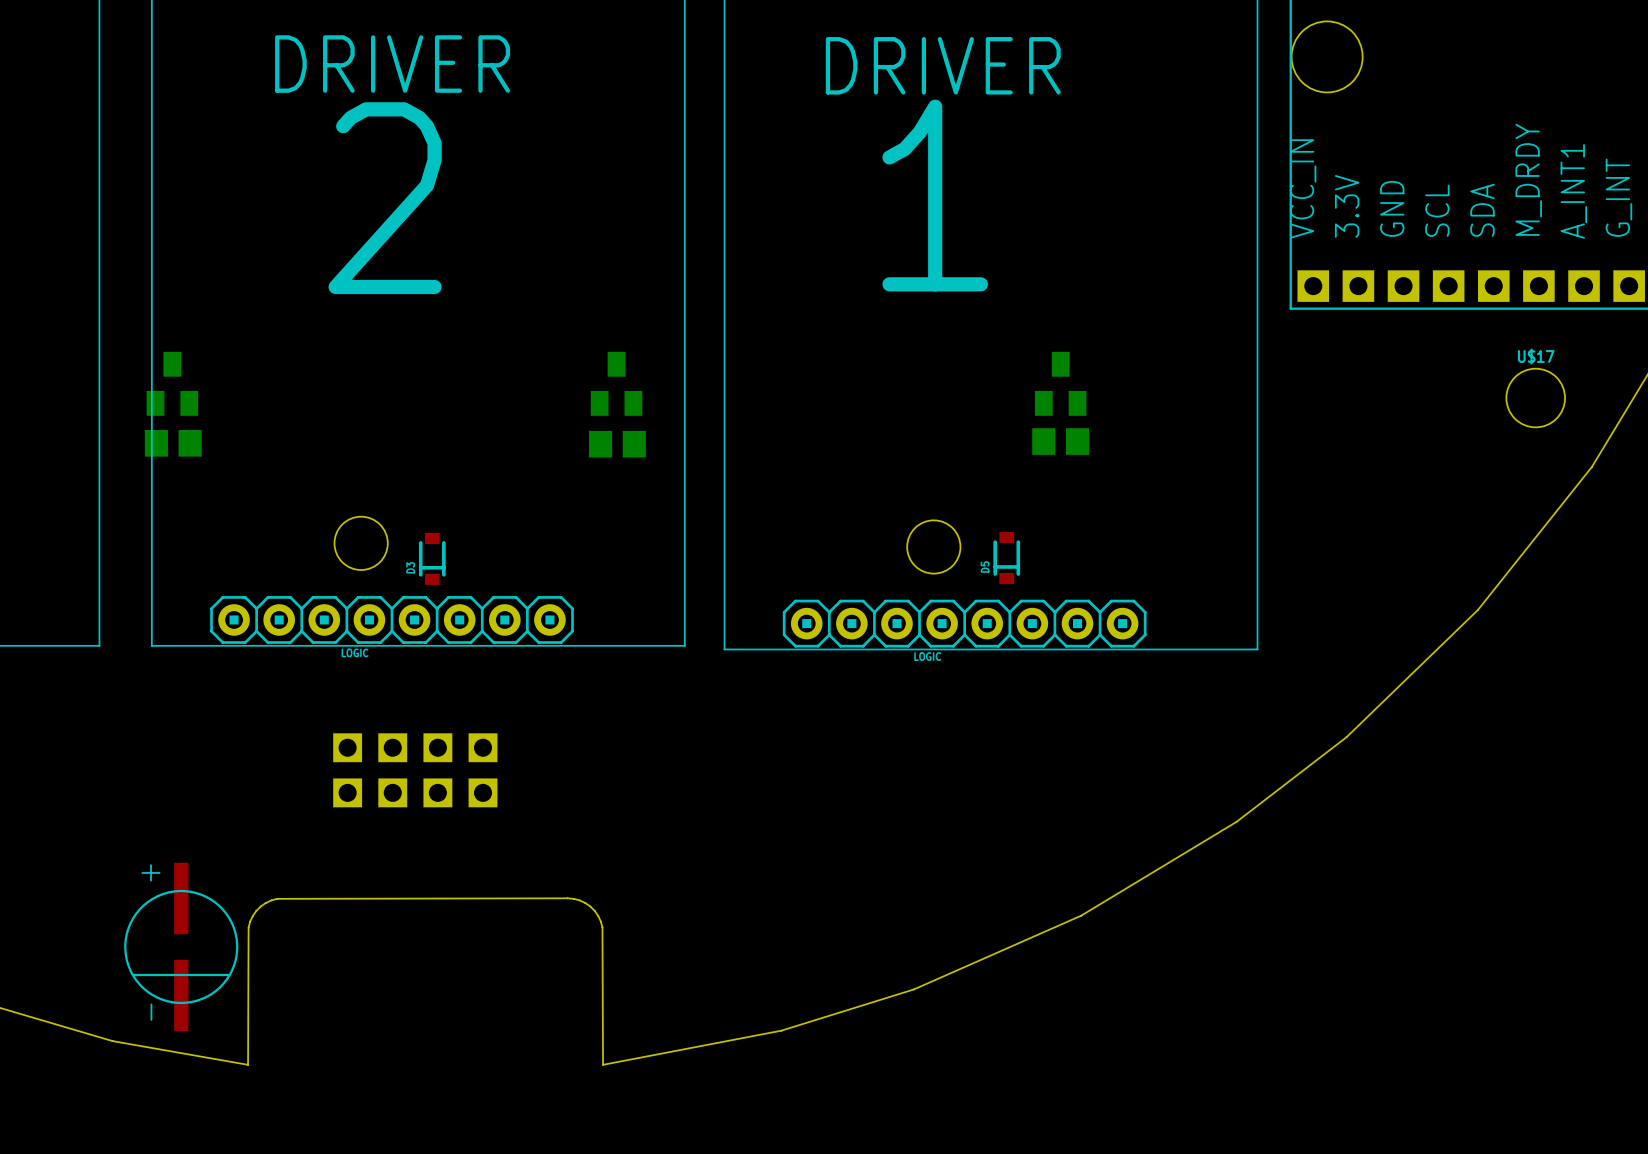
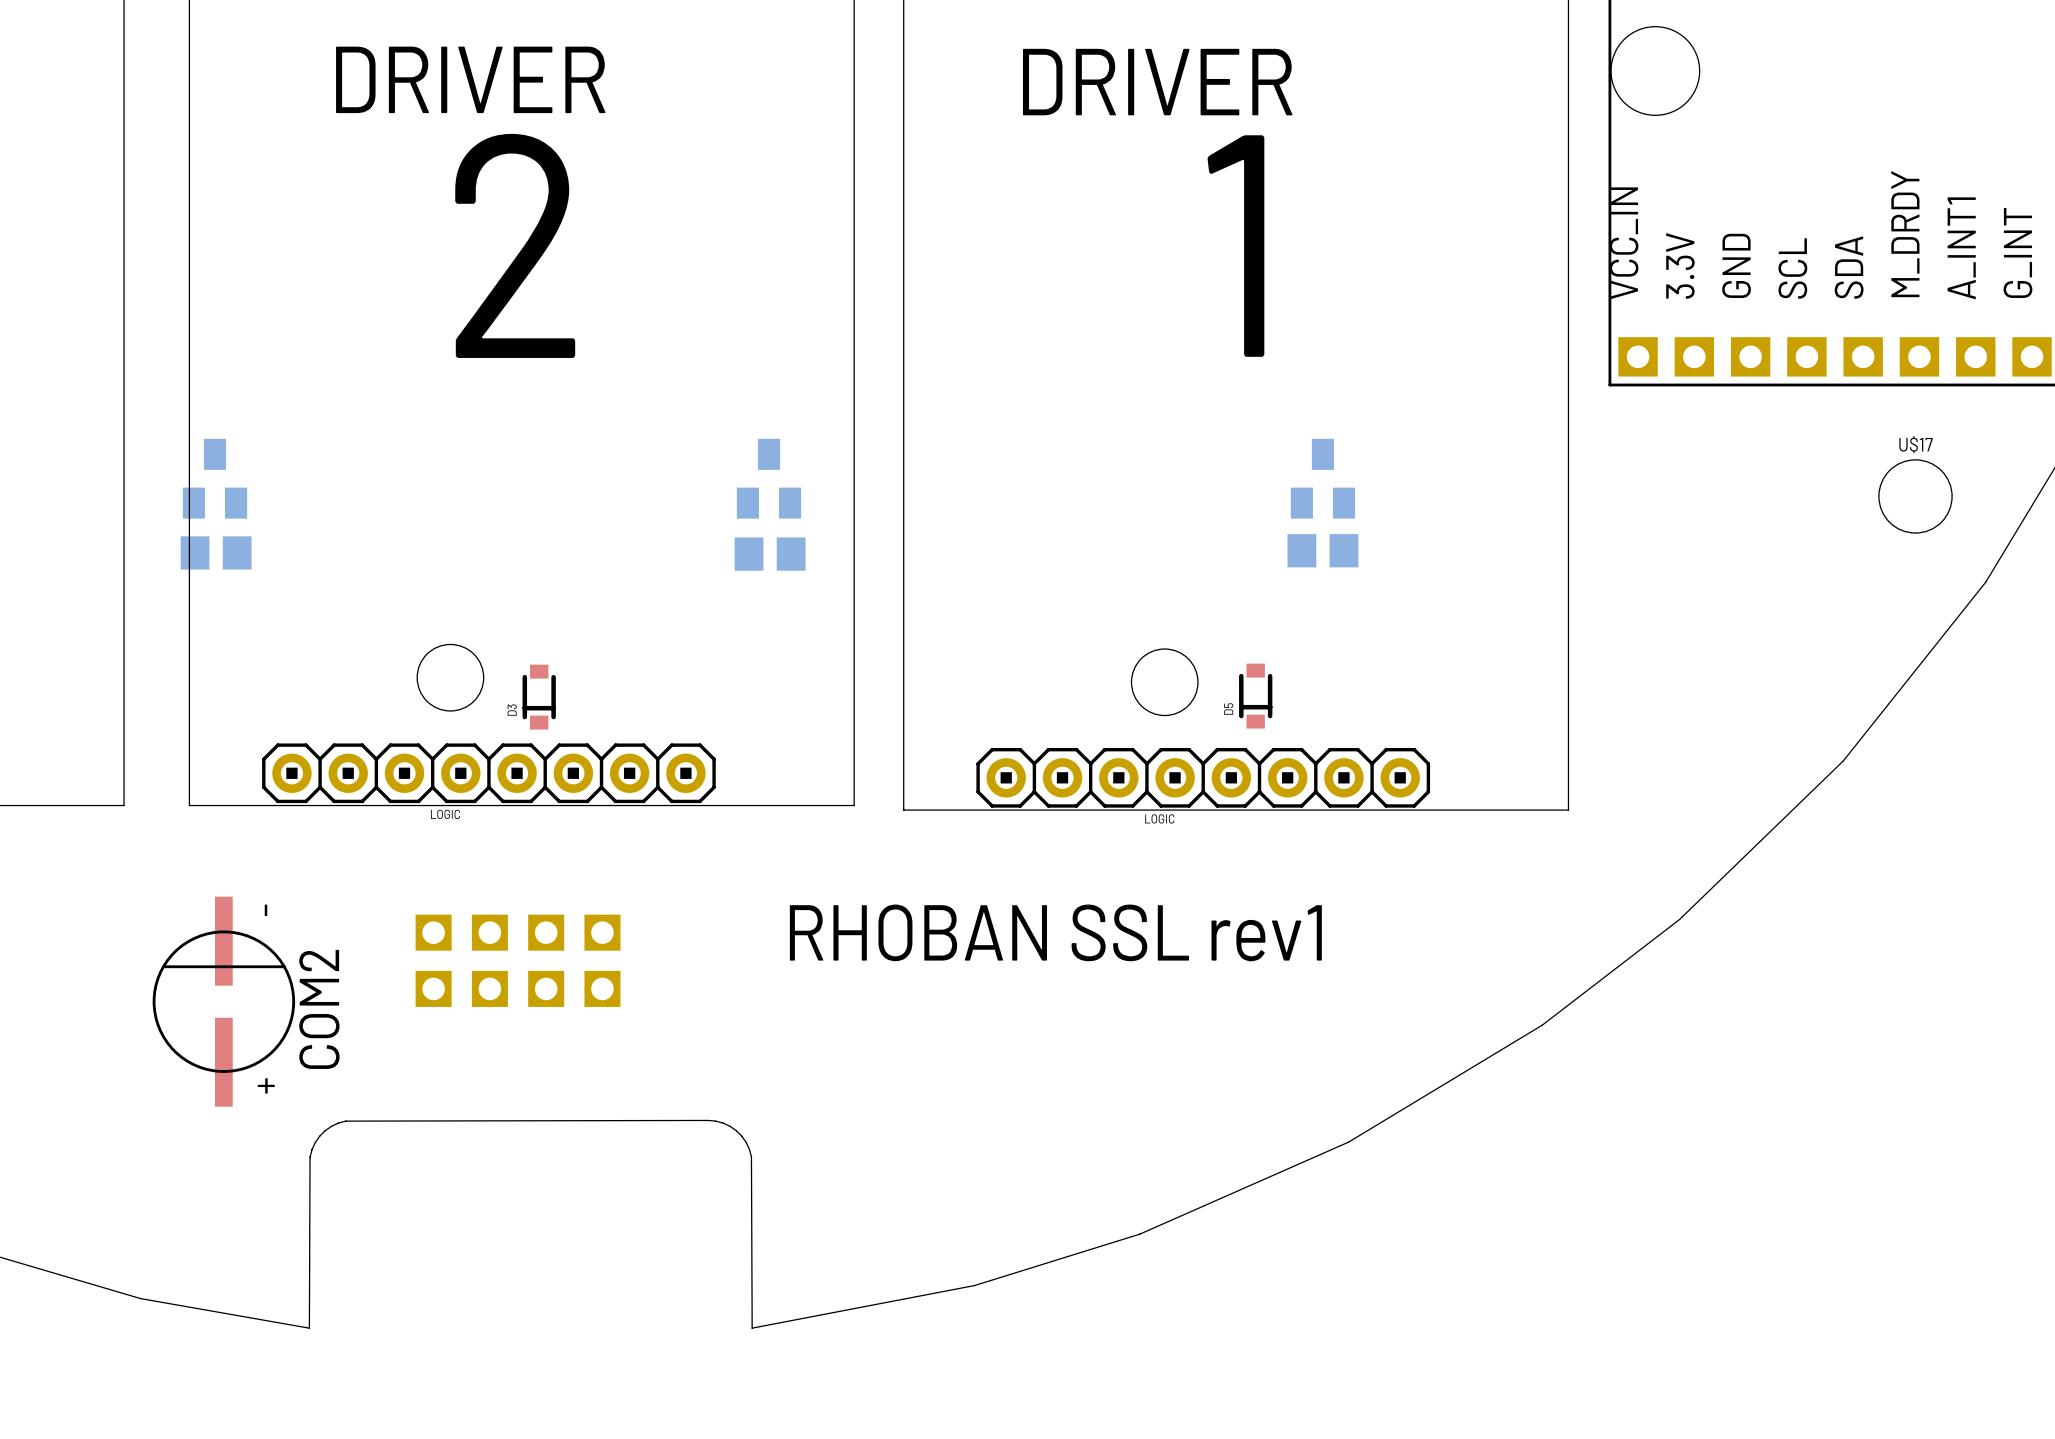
text position: 1 (935, 195) -> 1 (1235, 246)
text: none -> RHOBAN SSL rev1 (1055, 932)
text: none -> COM2 (319, 1009)
part: none -> (223, 1001)
part: (181, 946) -> none

